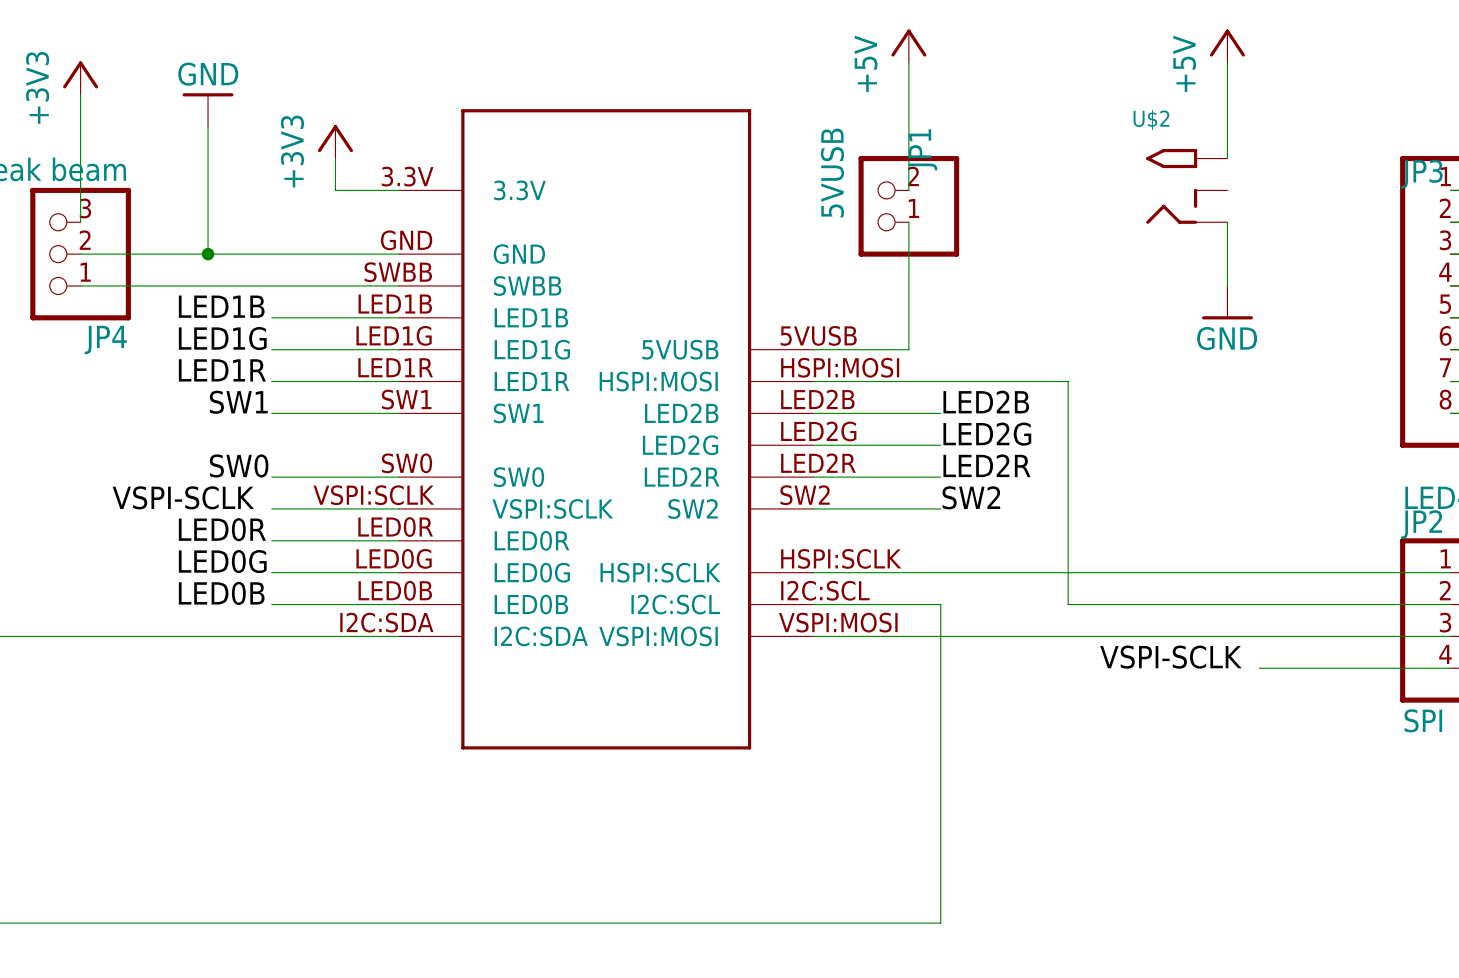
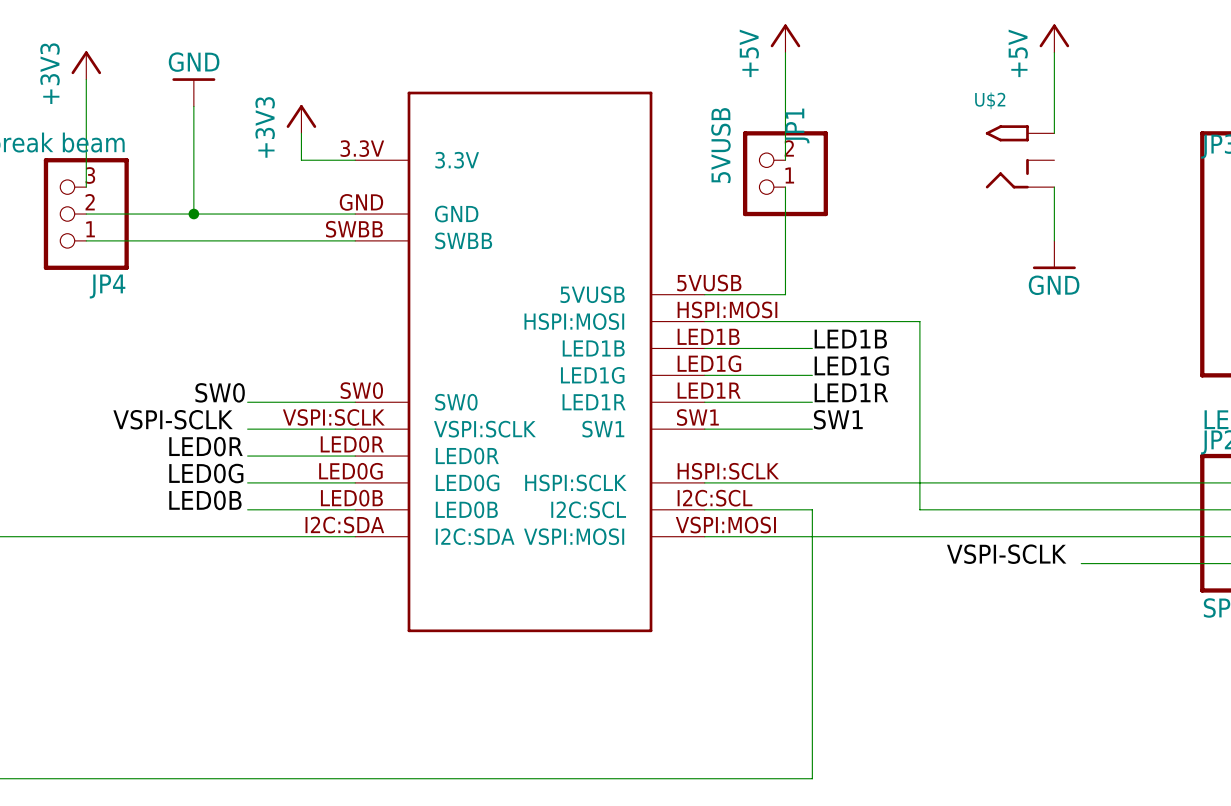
part symbol: [399, 109, 814, 750] -> [355, 91, 705, 633]
label: LED1B (221, 306) -> none
wire: (271, 317) (399, 317) -> none
label: LED1G (222, 338) -> none
wire: (271, 349) (399, 349) -> none
label: LED1R (222, 370) -> none
wire: (271, 381) (399, 381) -> none
label: SW1 (238, 402) -> none
label: LED2B (986, 402) -> LED1B (850, 339)
wire: (271, 413) (399, 413) -> none
label: LED2G (987, 434) -> LED1G (851, 365)
label: LED2R (986, 465) -> LED1R (851, 392)
label: SW2 (971, 497) -> SW1 (838, 419)

